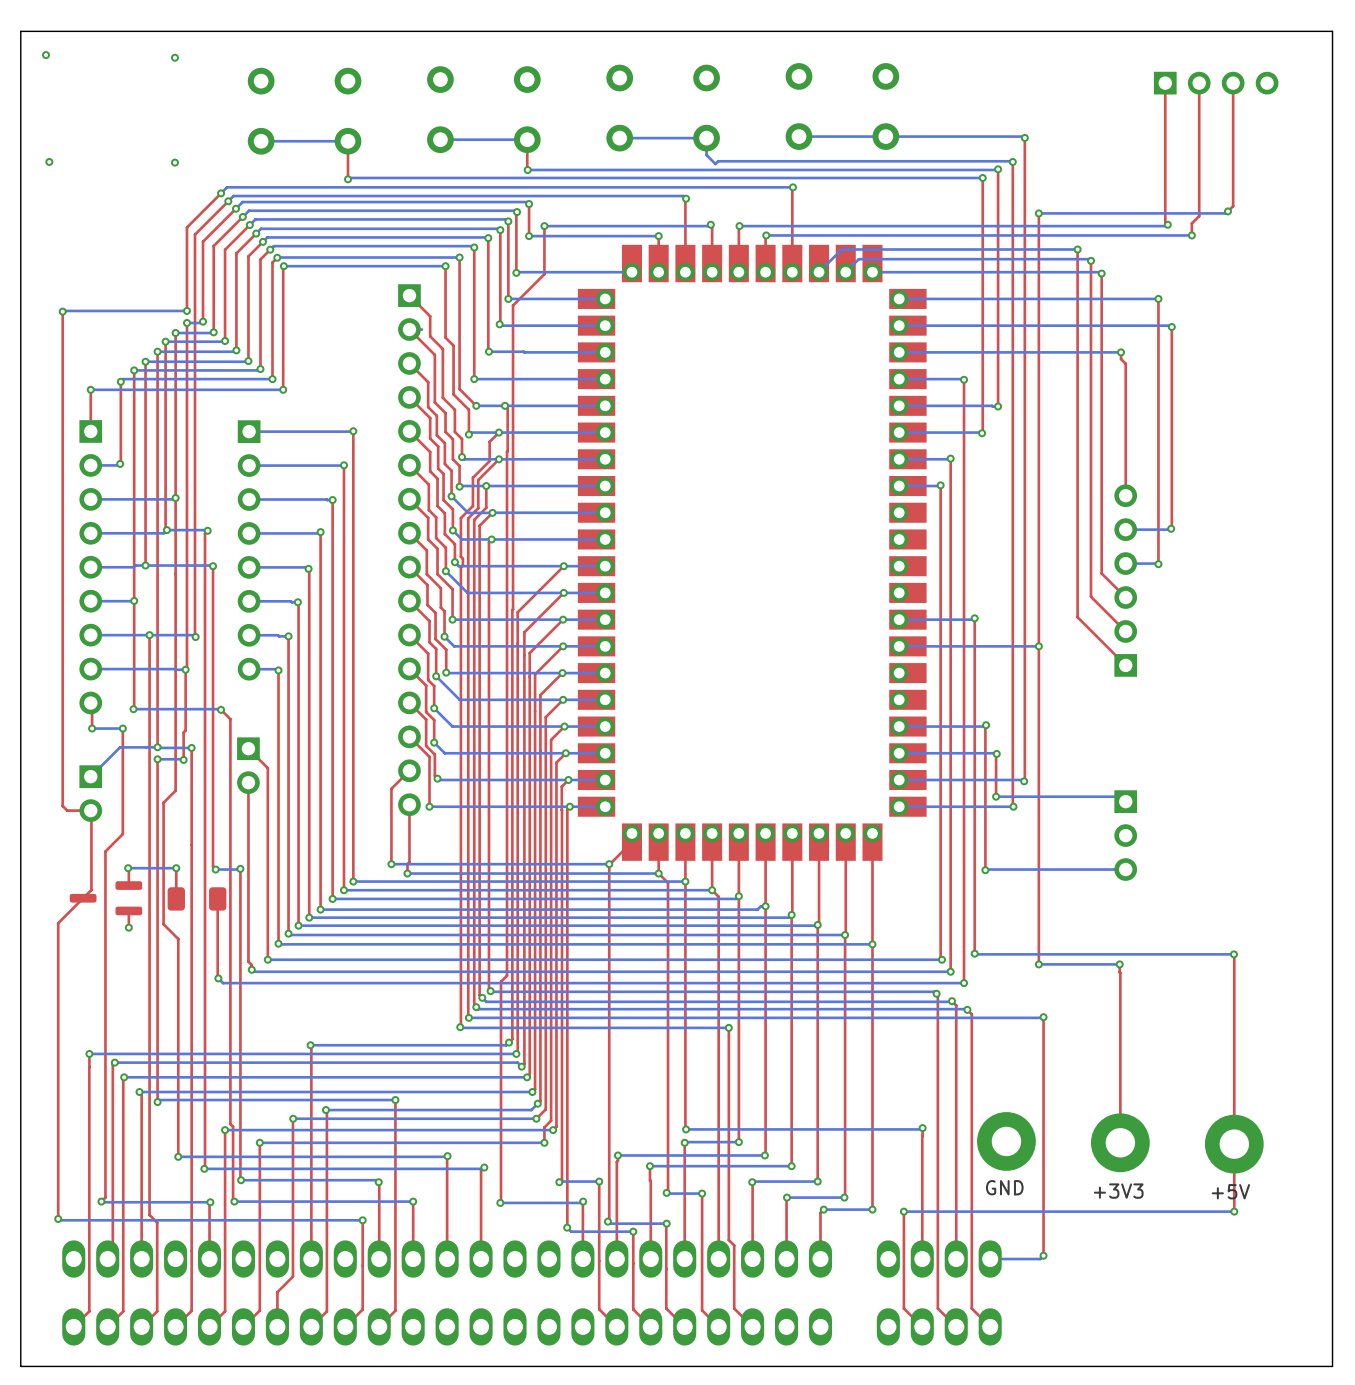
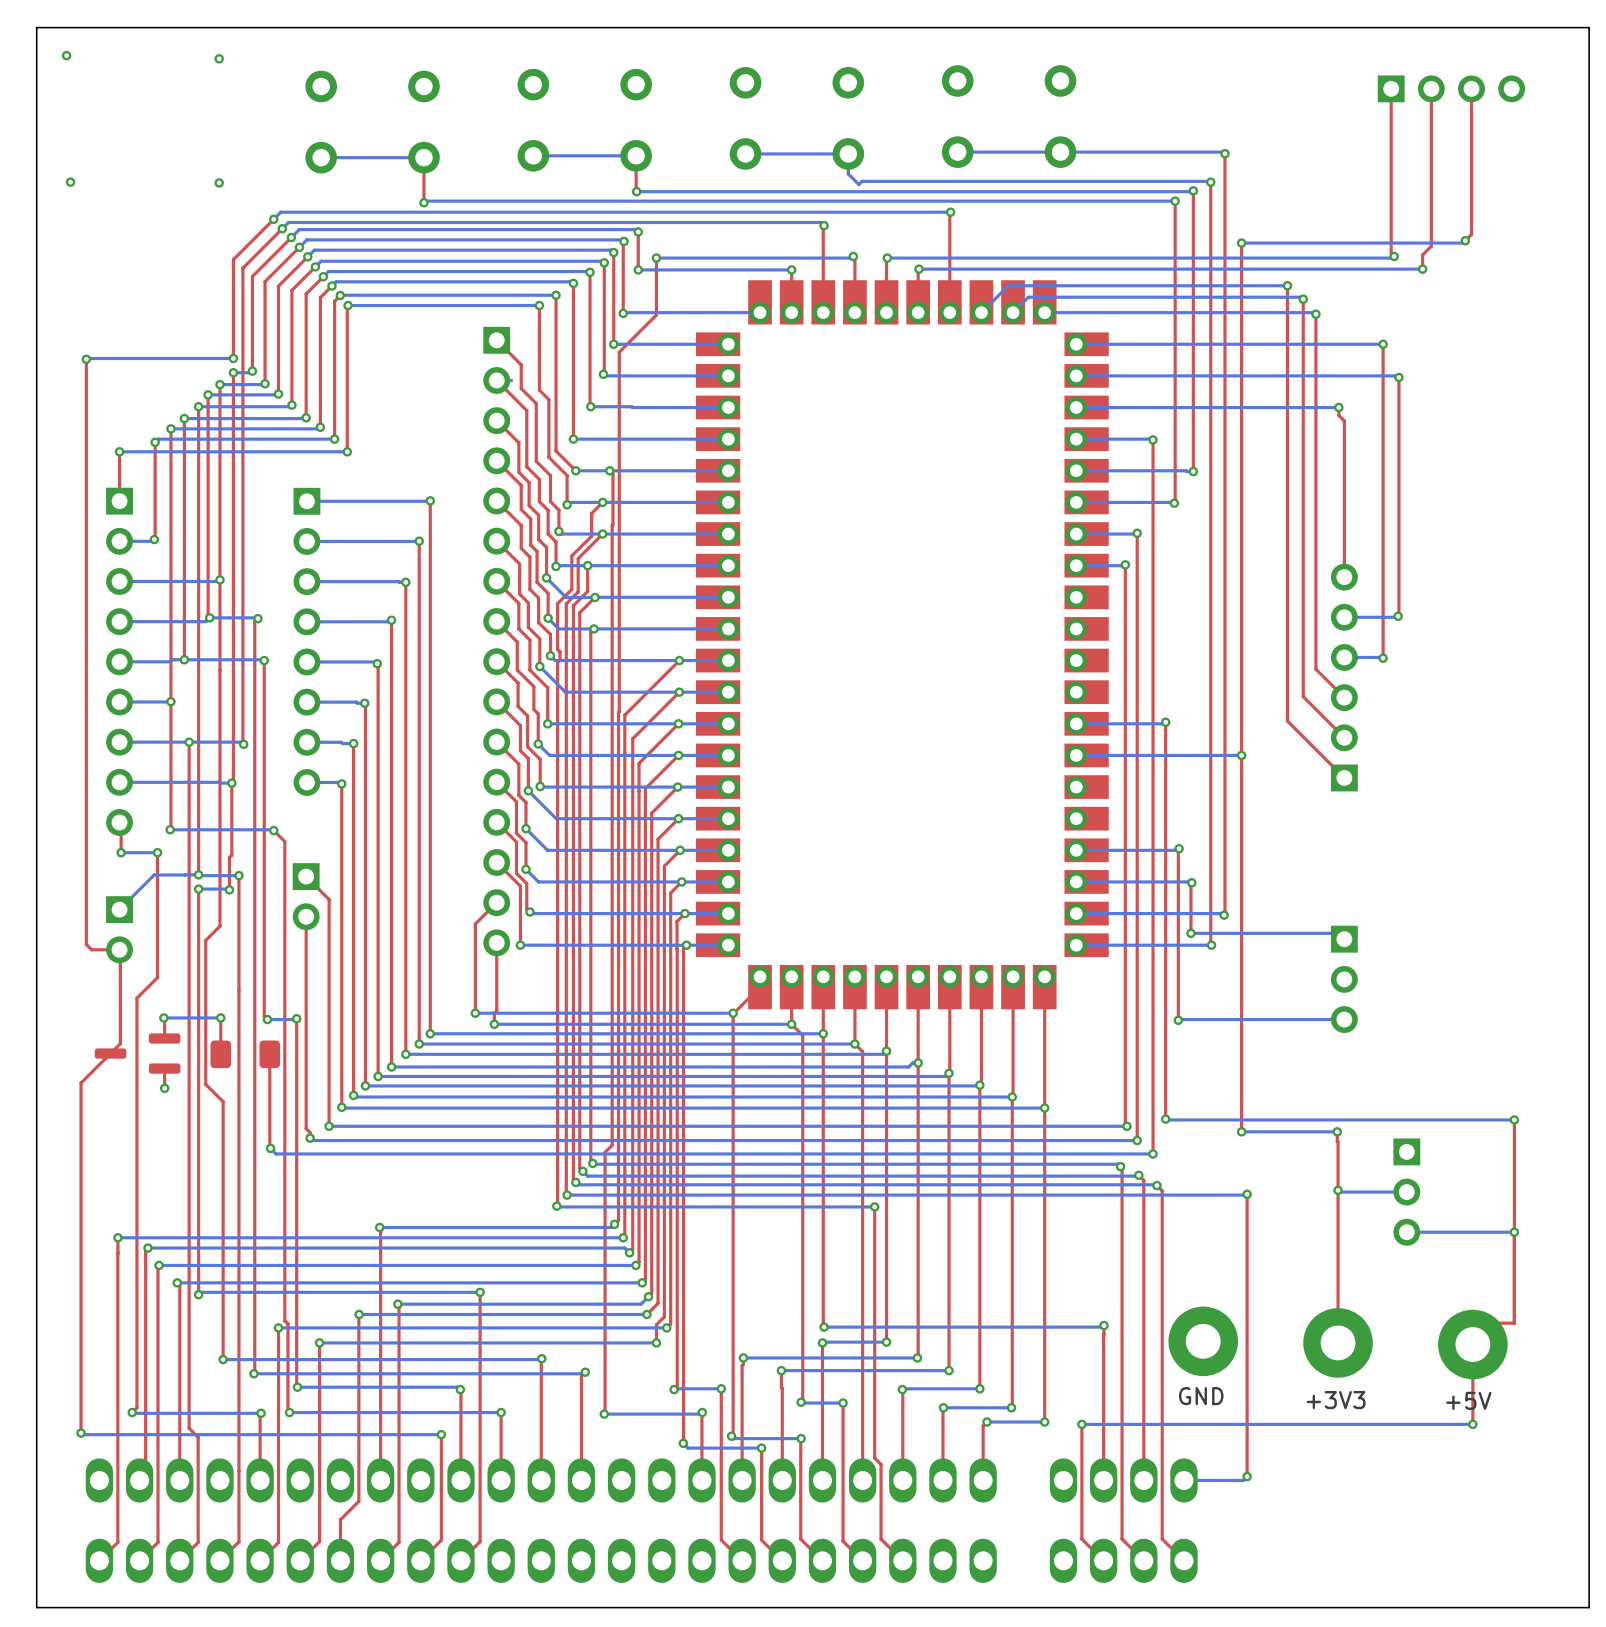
top track: (1233, 954) (1234, 1144) -> (1514, 1119) (1514, 1323) (1494, 1323) (1472, 1344)
via position: (1233, 954) -> (1514, 1119)
bottom track: none -> (1514, 1119) (1472, 1119)
bottom track: none -> (1338, 1190) (1339, 1192) (1406, 1192)
via: none -> (1338, 1190)
part: none -> (1406, 1192)
bottom track: none -> (1514, 1232) (1406, 1232)
via: none -> (1514, 1232)

